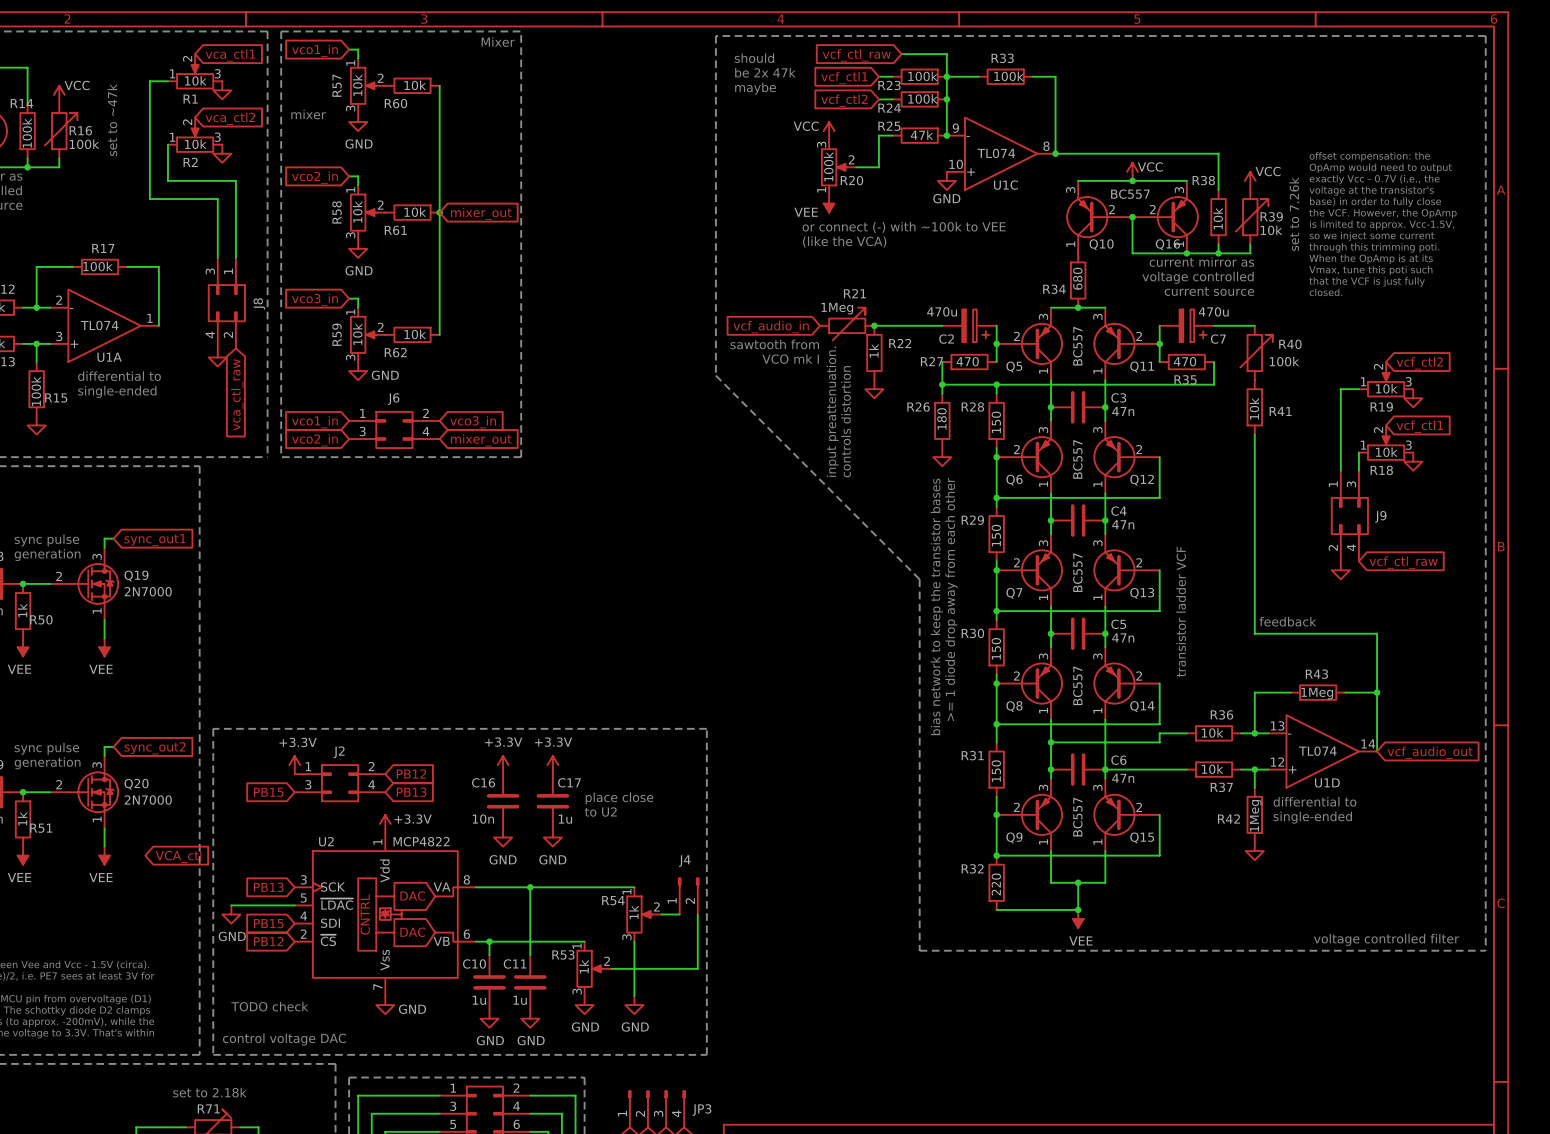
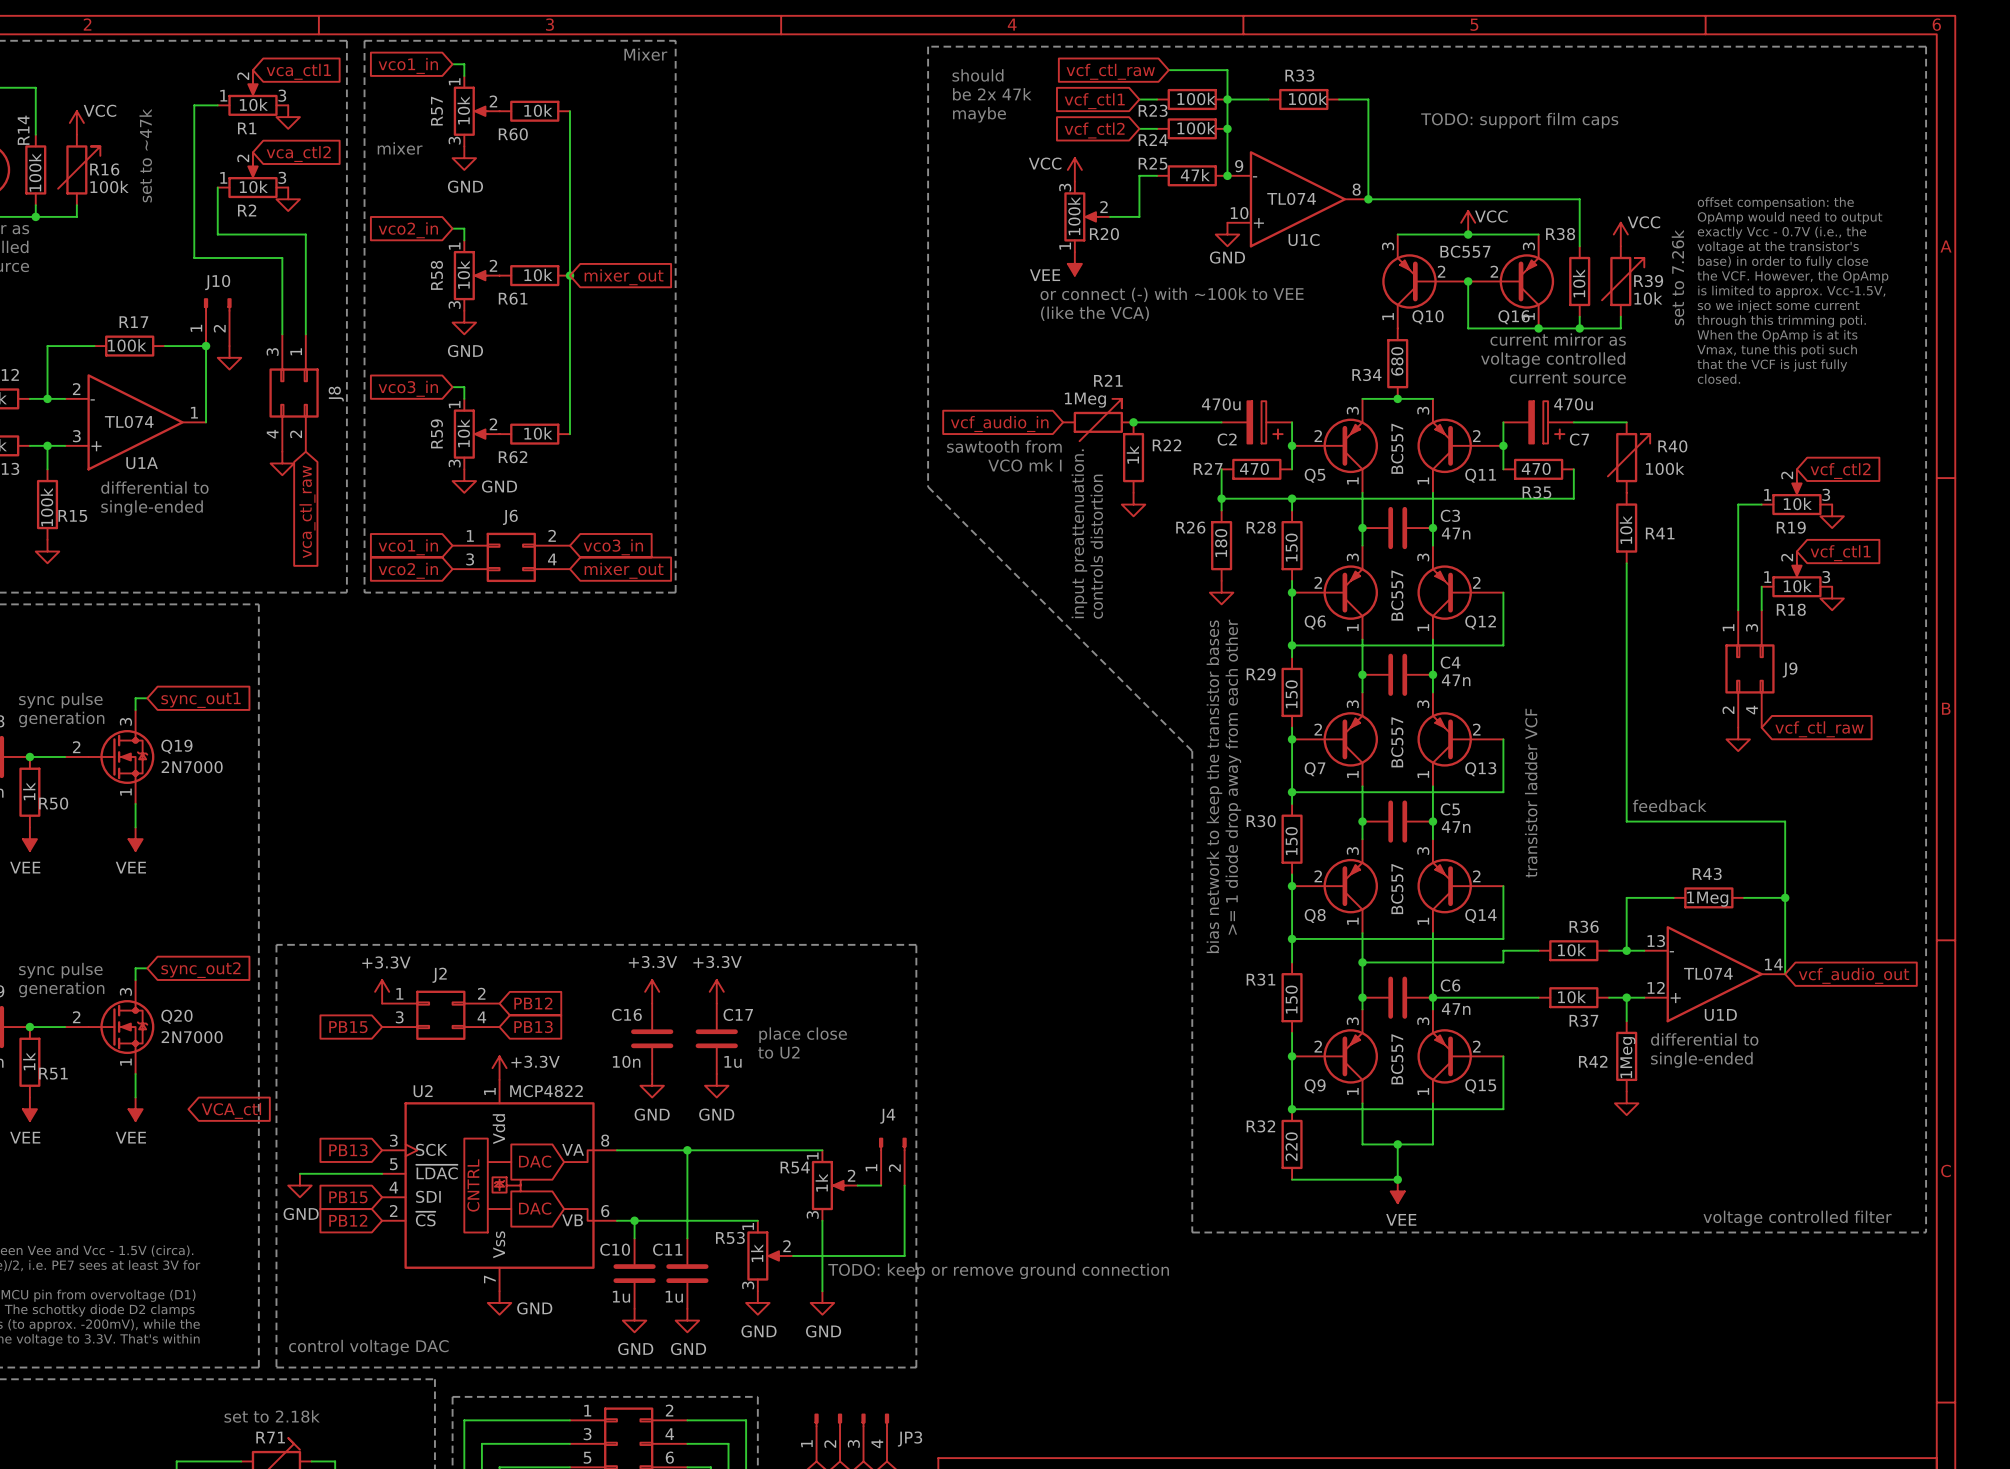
text: none -> TODO: support film caps (1519, 120)
R14 name rotation: 0° (21, 103) -> 90° counterclockwise (23, 130)
J10: none -> (217, 322)
junction: none -> (206, 346)
power symbol: none -> (229, 357)
text: none -> TODO: keep or remove ground connection (998, 1271)
text: TODO check (269, 1006) -> none

